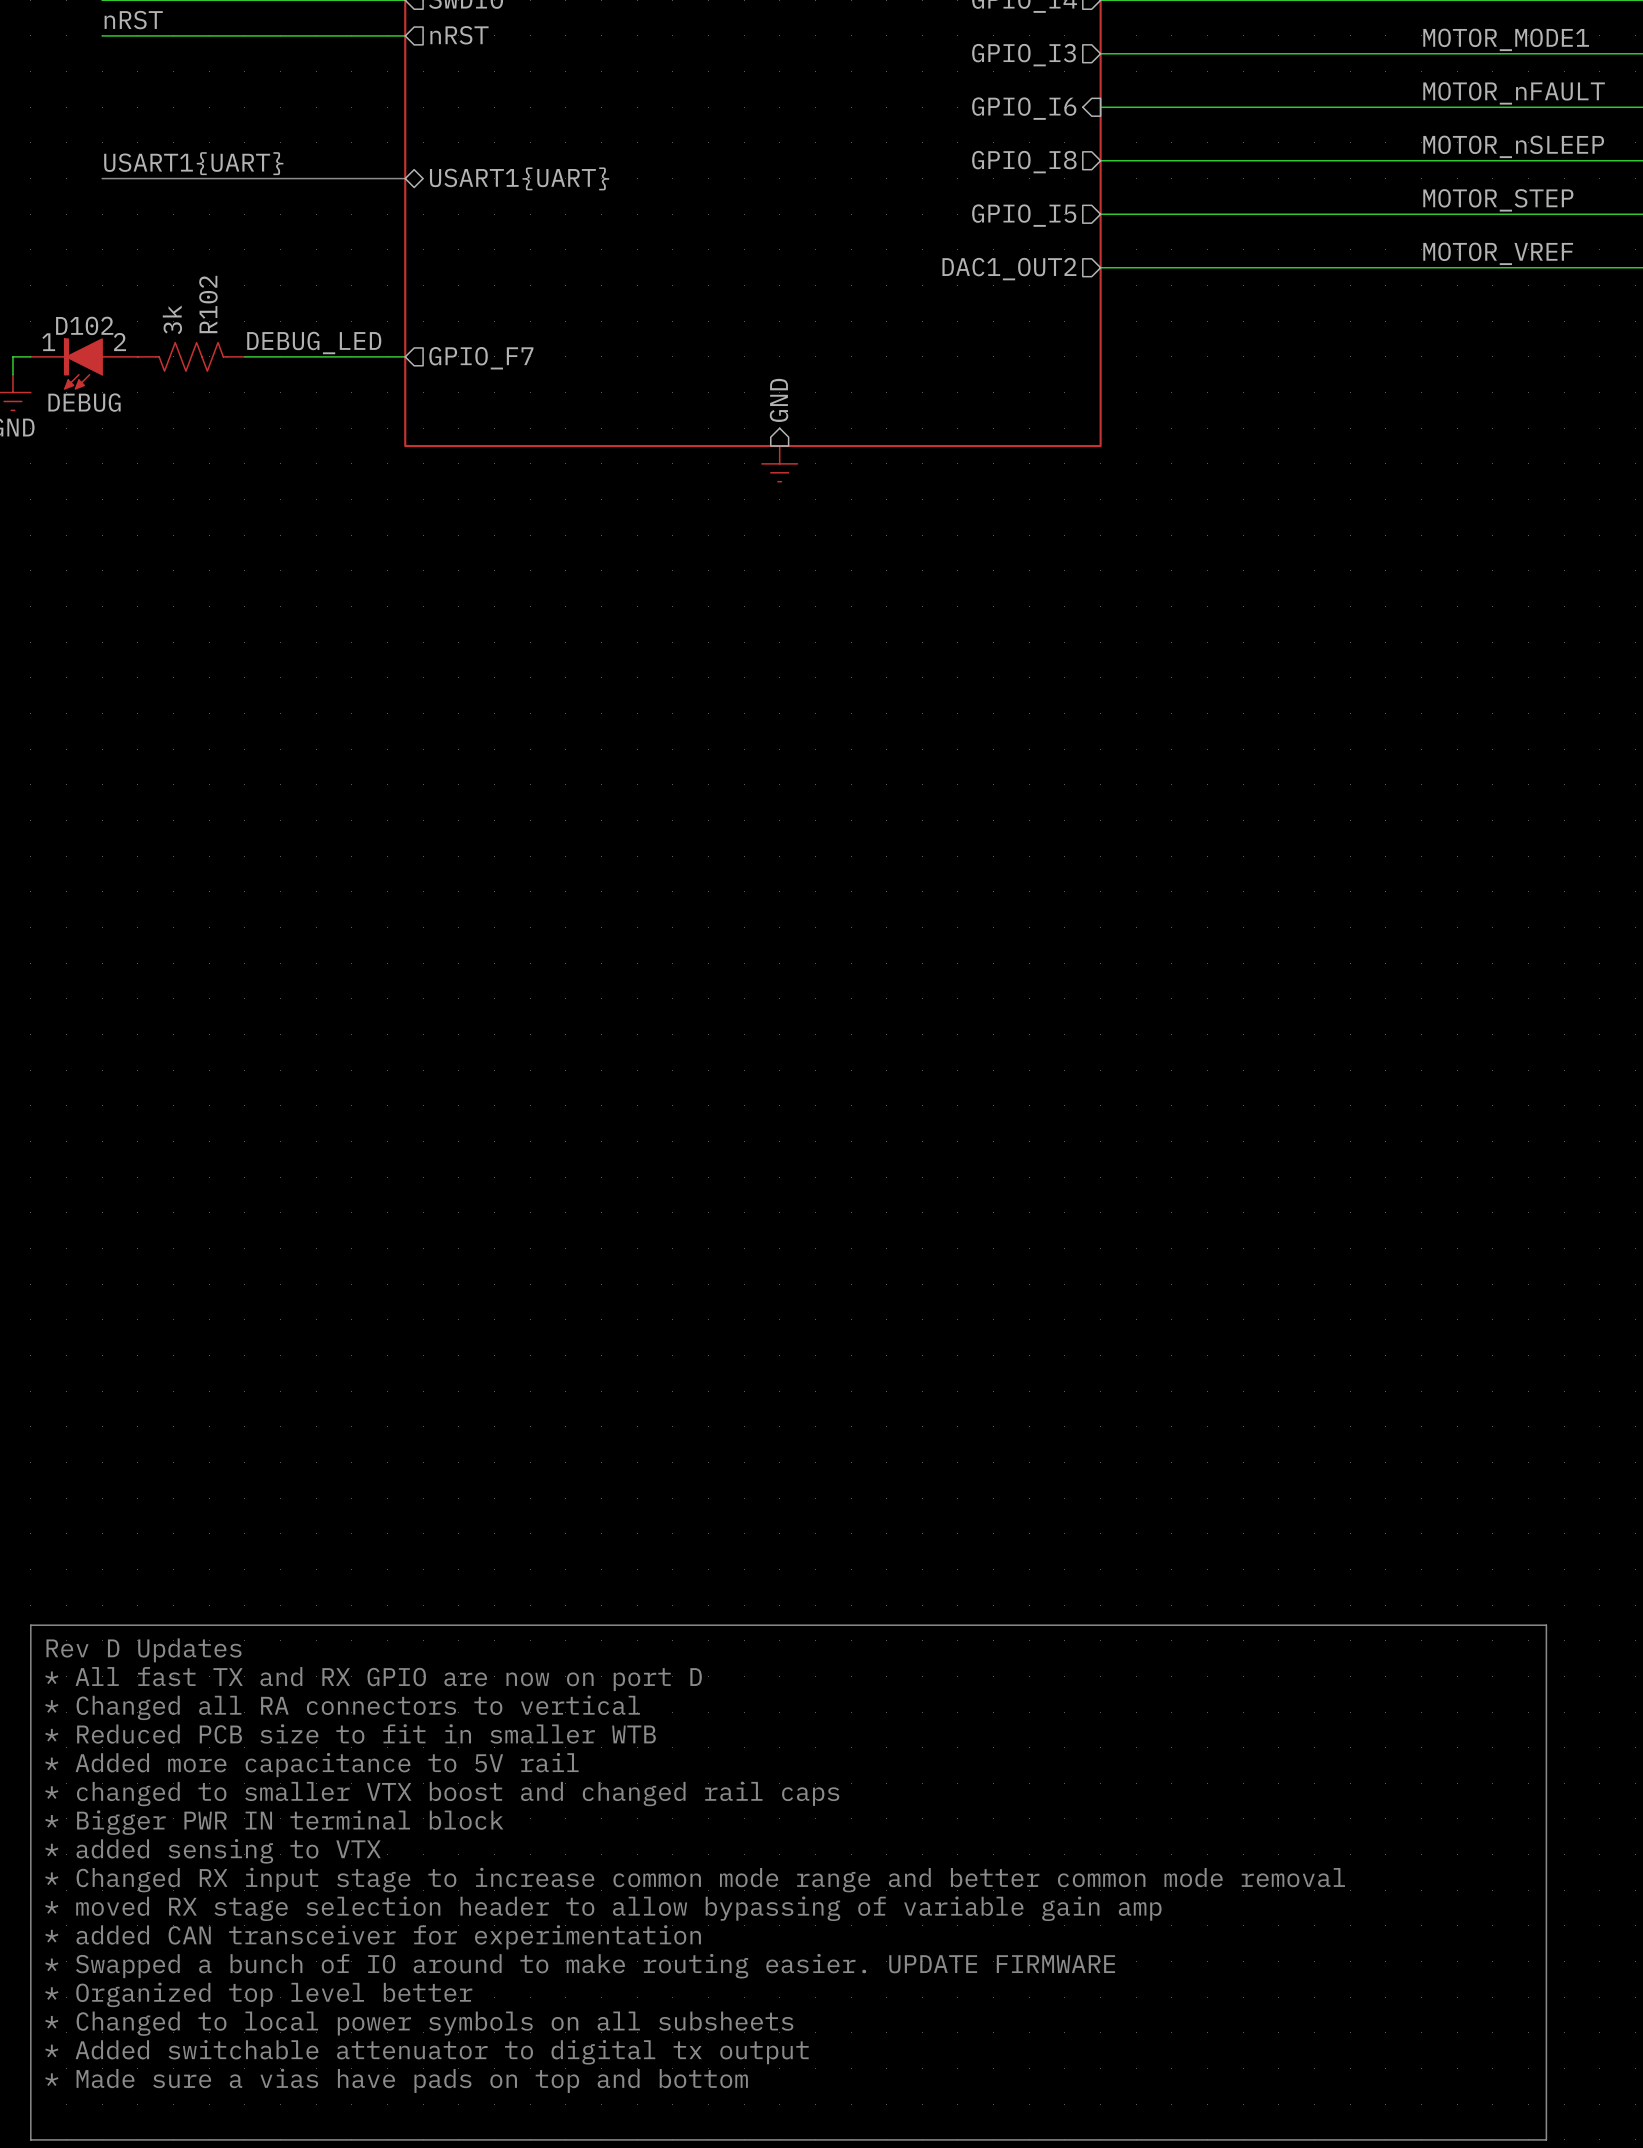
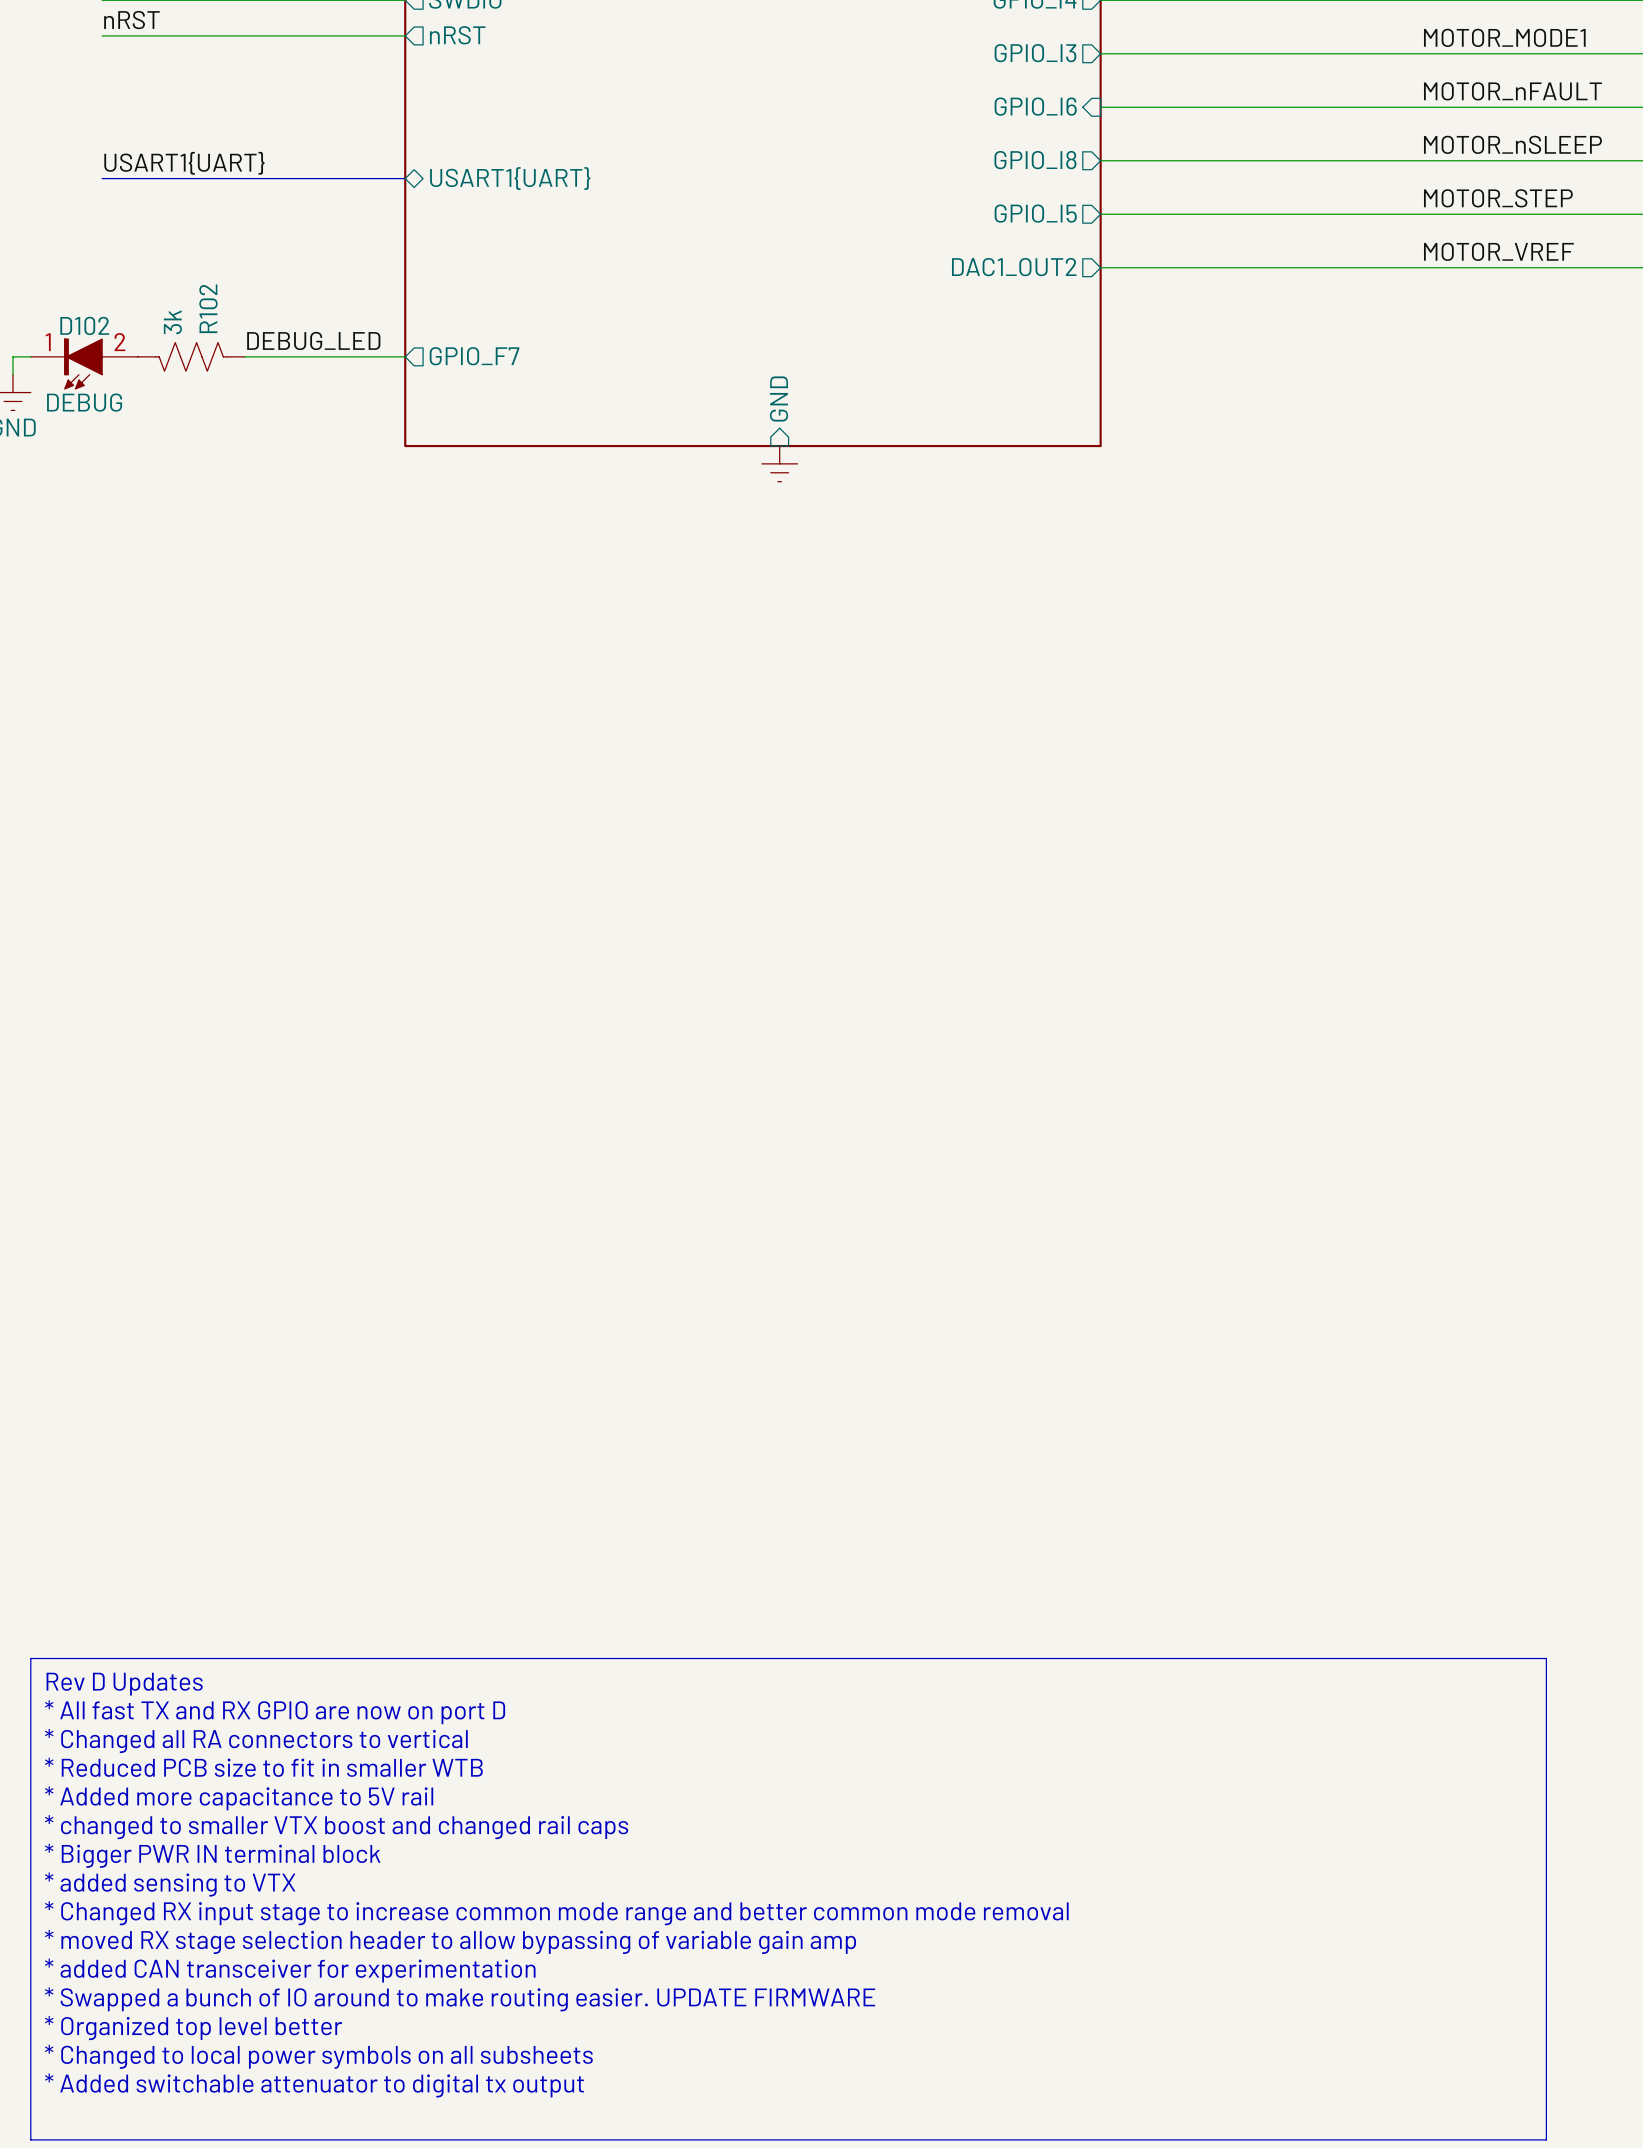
text position: Rev D Updates (143, 1650) -> Rev D Updates (124, 1684)
line: (30, 1658) (30, 1625) (1546, 1625) (1546, 1658) -> (30, 1658) (1546, 1658)
text position: * All fast TX and RX GPIO are now on port D (373, 1679) -> * All fast TX and RX GPIO are now on port D (275, 1712)
text position: * Changed all RA connectors to vertical (342, 1707) -> * Changed all RA connectors to vertical (256, 1740)
text position: * Reduced PCB size to fit in smaller WTB (350, 1733) -> * Reduced PCB size to fit in smaller WTB (263, 1767)
text position: * Added more capacitance to 5V rail (311, 1765) -> * Added more capacitance to 5V rail (239, 1798)
text position: * changed to smaller VTX boost and changed rail caps (442, 1793) -> * changed to smaller VTX boost and changed rail caps (336, 1827)
text position: * Bigger PWR IN terminal block (274, 1822) -> * Bigger PWR IN terminal block (212, 1855)
text position: * added sensing to VTX (213, 1851) -> * added sensing to VTX (170, 1884)
text position: * Changed RX input stage to increase common mode range and better common mode removal (695, 1880) -> * Changed RX input stage to increase common mode range and better common mode removal (556, 1913)
text position: * moved RX stage selection header to allow bypassing of variable gain amp (603, 1908) -> * moved RX stage selection header to allow bypassing of variable gain amp (450, 1941)
text position: * added CAN transceiver for experimentation (373, 1937) -> * added CAN transceiver for experimentation (290, 1970)
text position: * Swapped a bunch of IO around to make routing easier. UPDATE FIRMWARE (580, 1966) -> * Swapped a bunch of IO around to make routing easier. UPDATE FIRMWARE (460, 1999)
text position: * Organized top level better (258, 1994) -> * Organized top level better (193, 2028)
text position: * Changed to local power symbols on all subsheets (419, 2023) -> * Changed to local power symbols on all subsheets (318, 2056)
text position: * Added switchable attenuator to digital tx output (426, 2052) -> * Added switchable attenuator to digital tx output (314, 2085)
text: * Made sure a vias have pads on top and bottom (396, 2080) -> none

